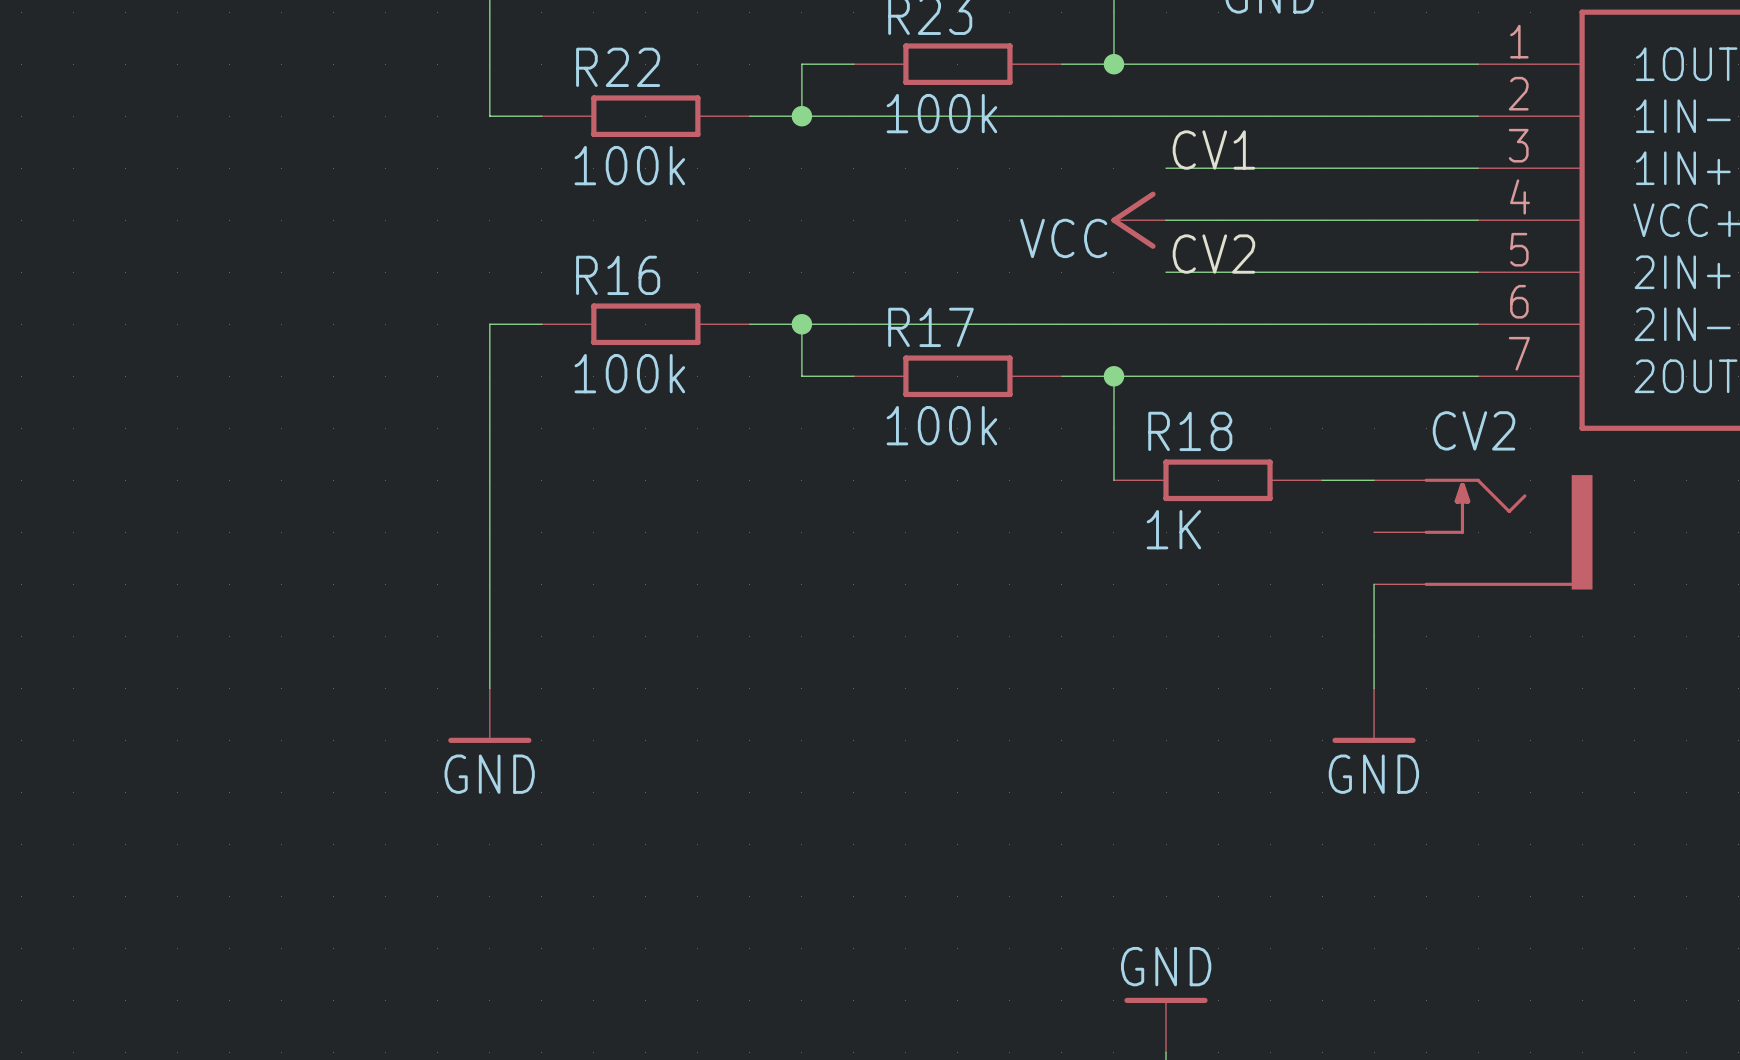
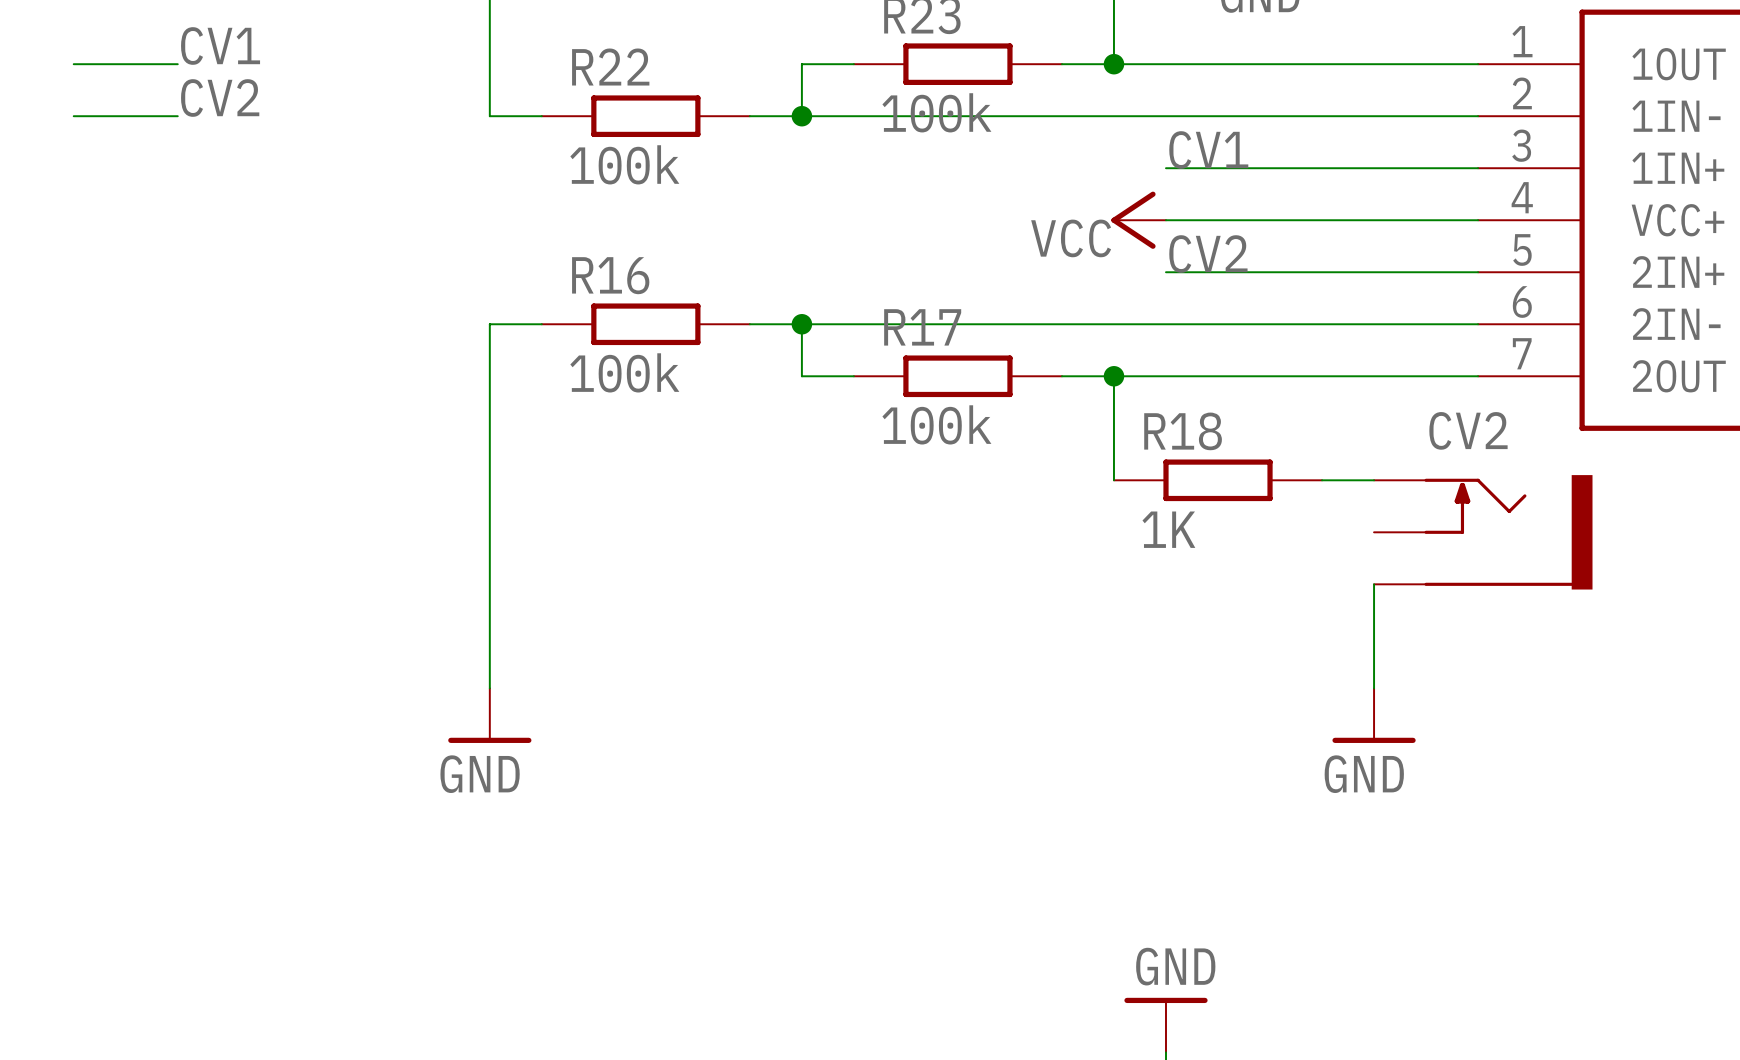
label: none -> CV1 (220, 45)
wire: none -> (73, 64) (177, 64)
label: none -> CV2 (220, 98)
wire: none -> (73, 116) (177, 116)

